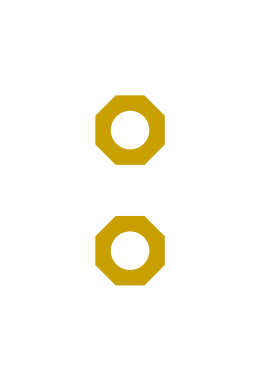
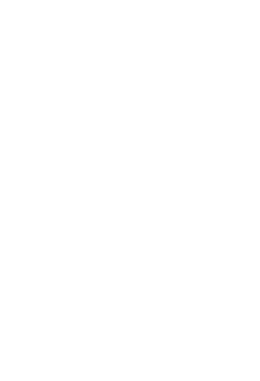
part: (130, 190) -> none

